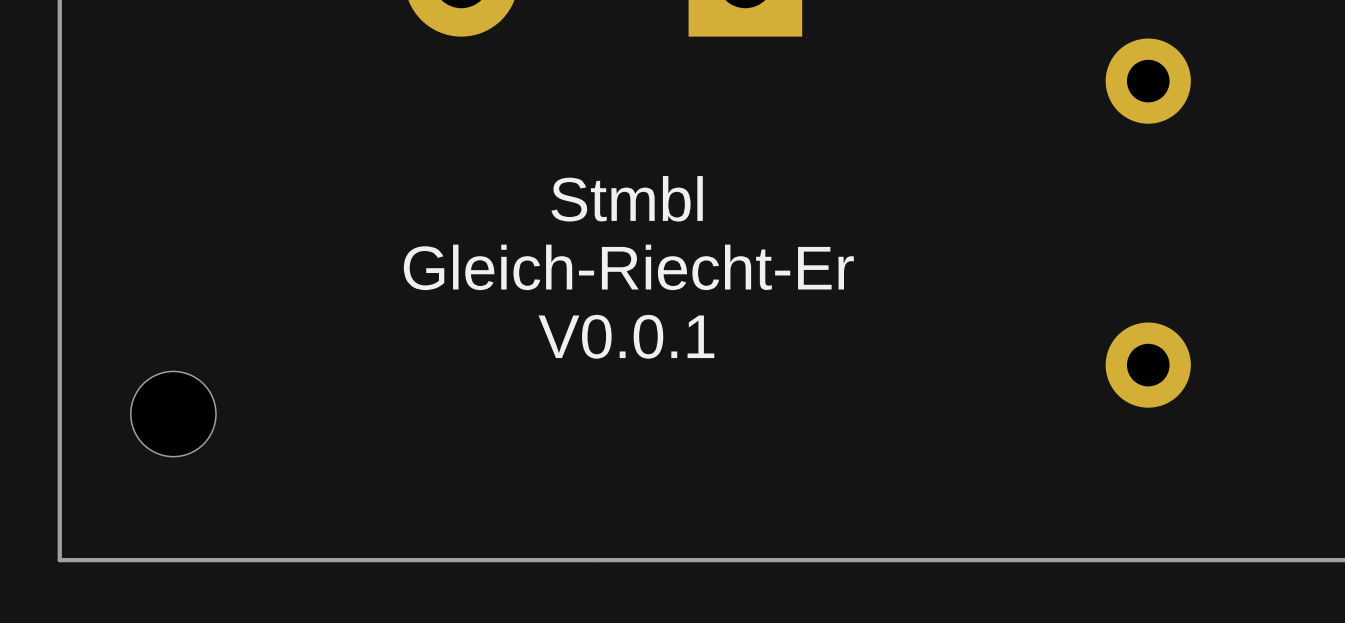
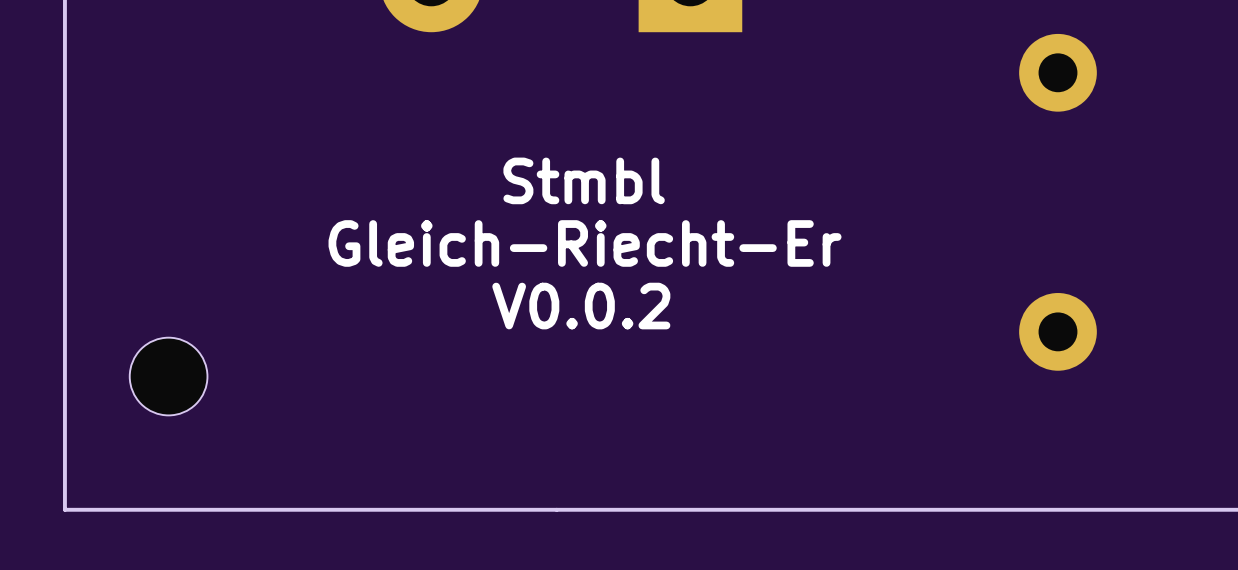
text: V0.0.1 (626, 336) -> V0.0.2 (581, 306)

